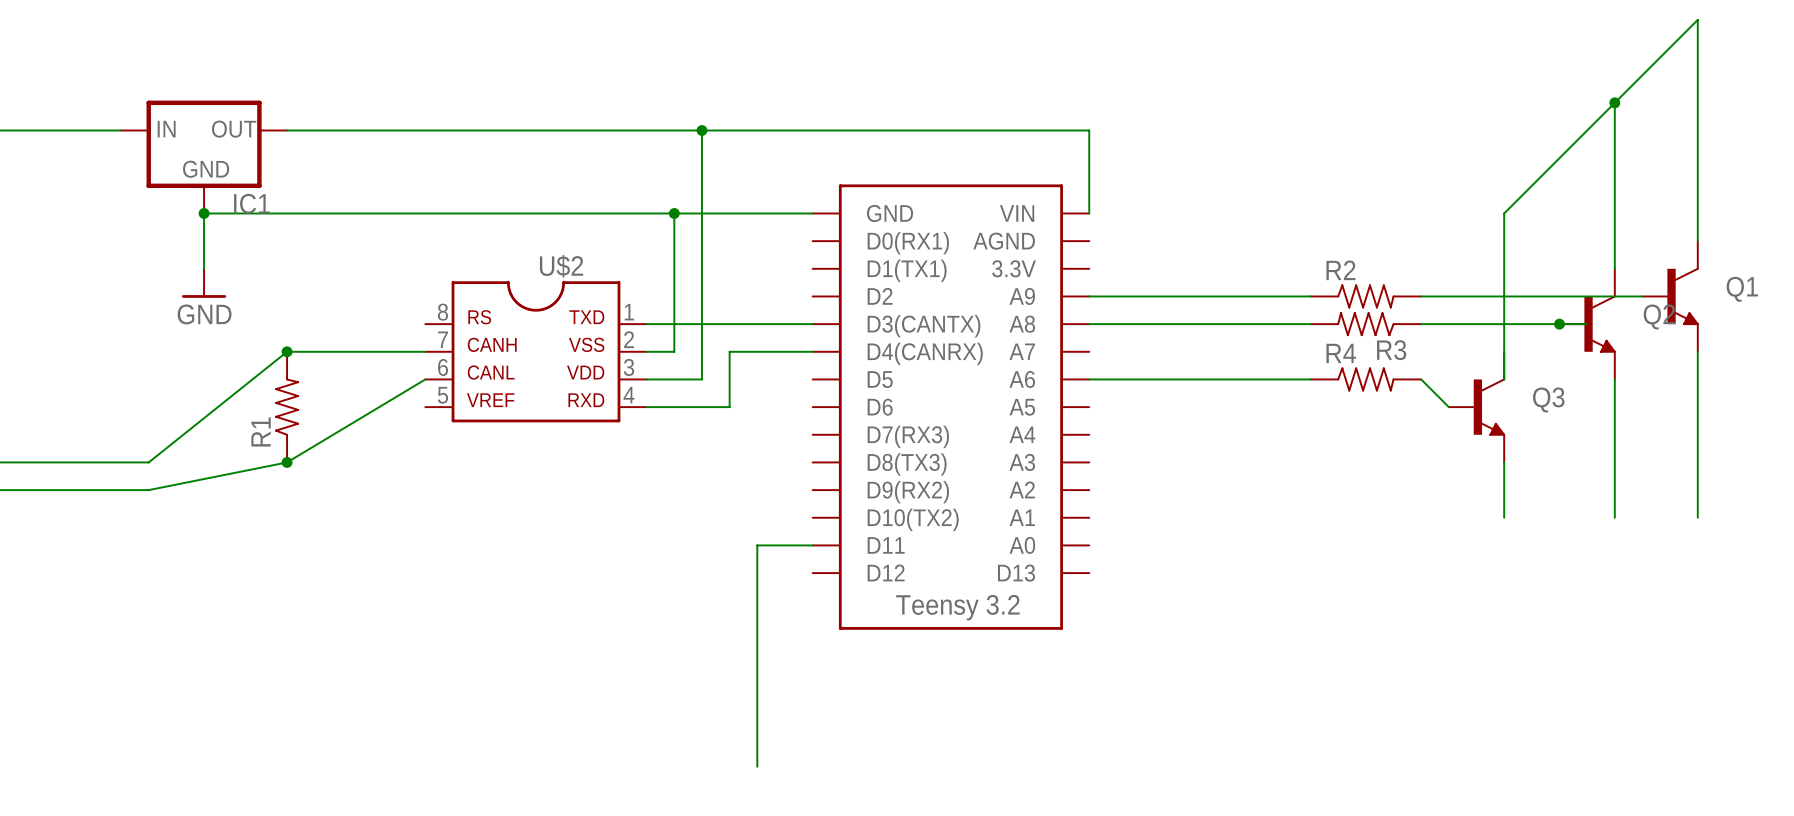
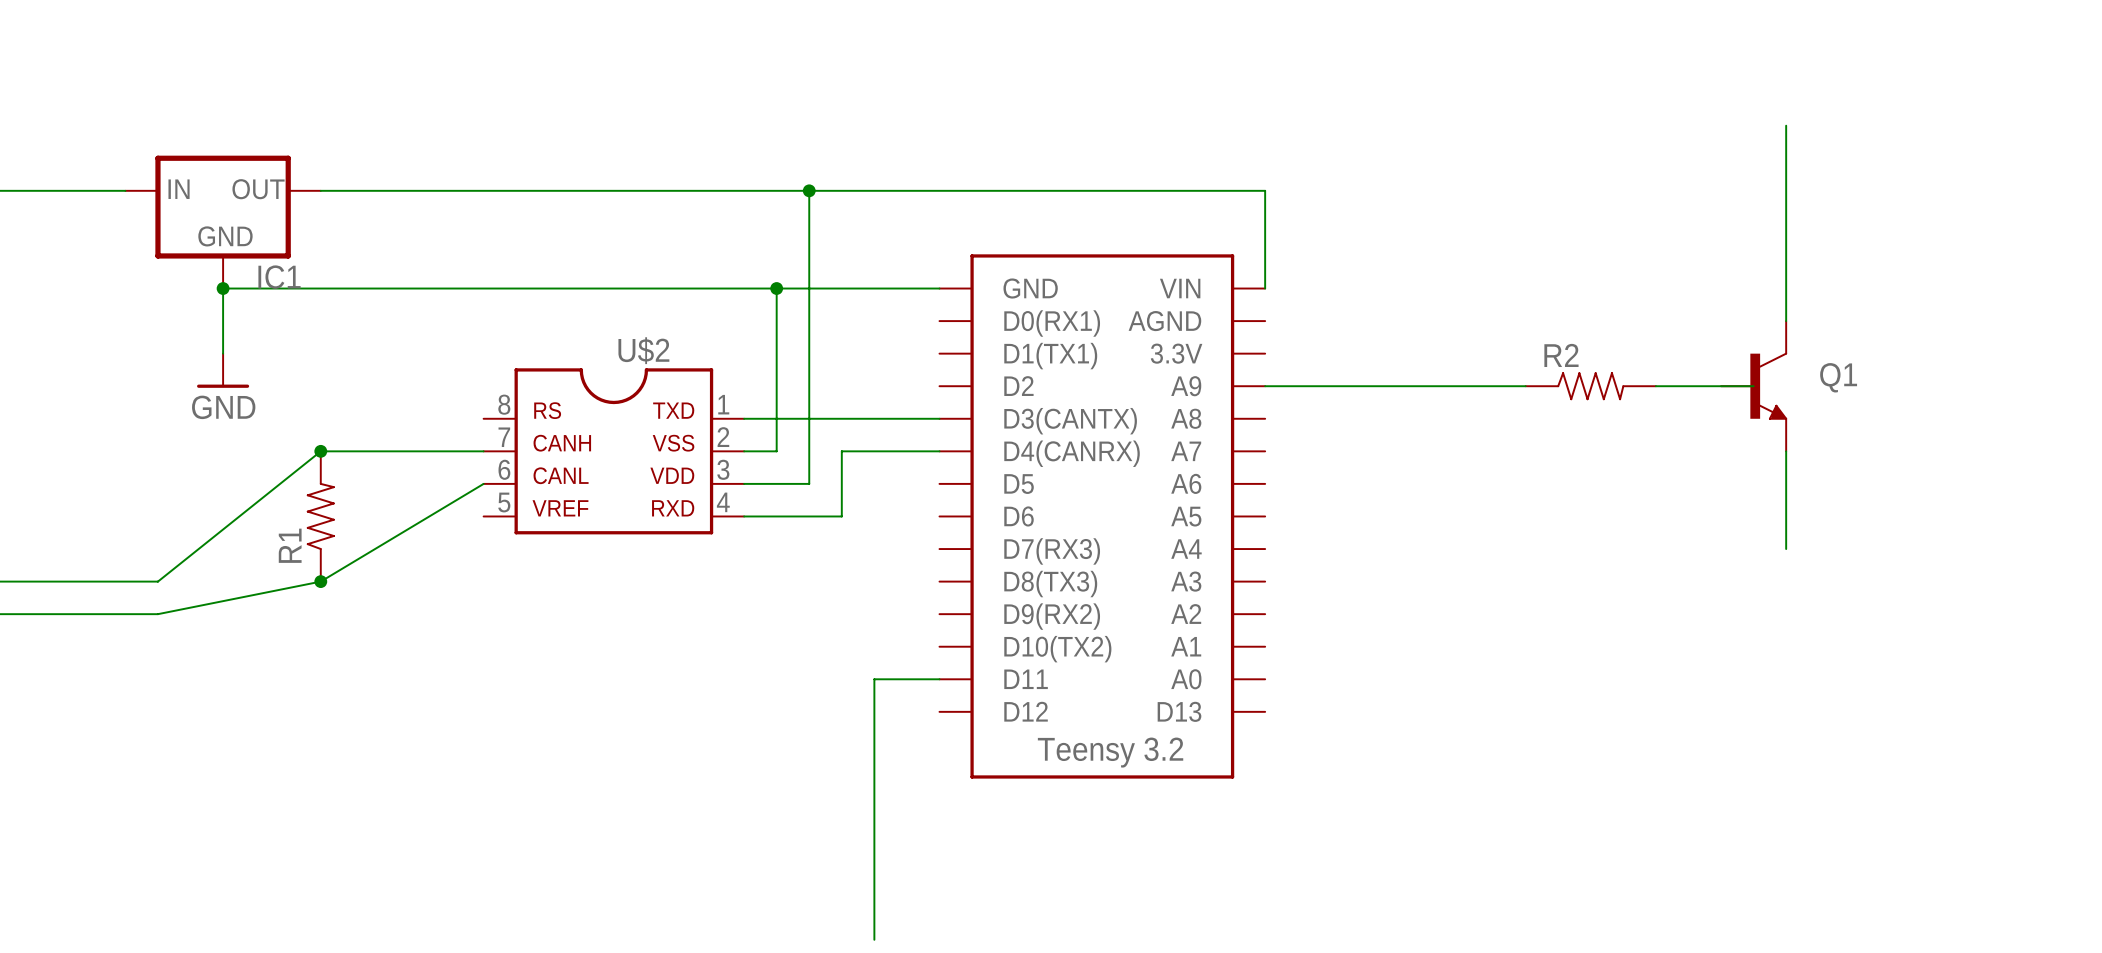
wire: (1614, 102) (1614, 268) -> (1786, 125) (1786, 321)
junction: (1614, 102) -> none
wire: (1697, 241) (1697, 19) (1504, 213) (1504, 379) -> none
wire: (1504, 296) (1642, 296) -> none
Q1 position: (1670, 296) -> (1754, 386)
wire: (1089, 324) (1310, 324) -> none
R3: (1365, 324) -> none
wire: (1421, 324) (1587, 324) -> none
junction: (1559, 324) -> none
Q2: (1587, 324) -> none
wire: none -> (1786, 451) (1786, 549)
wire: (1697, 351) (1697, 517) -> none
wire: (1089, 379) (1310, 379) -> none
R4: (1365, 379) -> none
wire: (1421, 379) (1448, 407) -> none
wire: (1614, 379) (1614, 517) -> none
Q3: (1476, 407) -> none
wire: (1504, 462) (1504, 517) -> none

